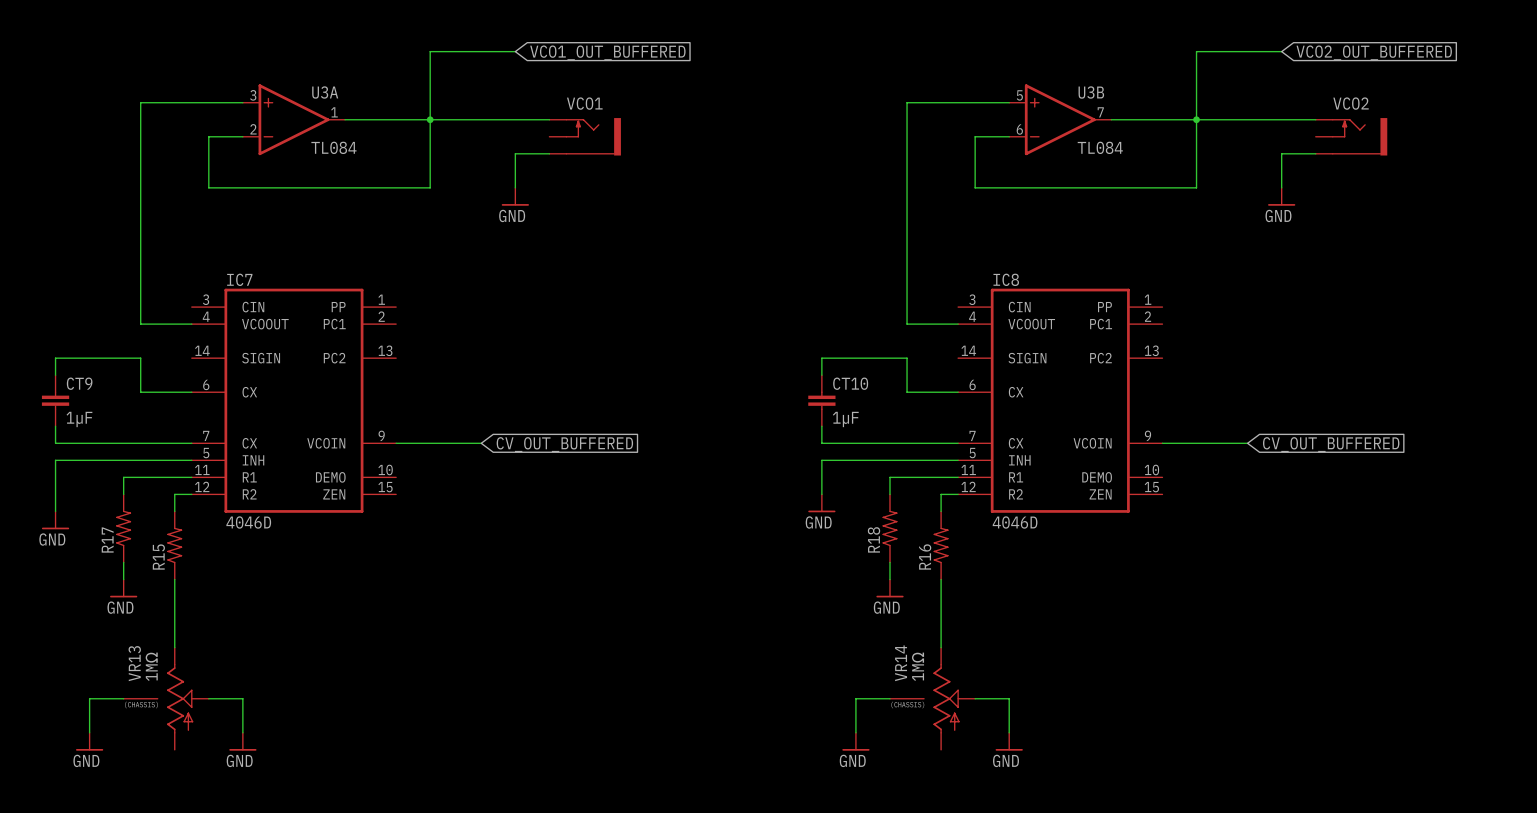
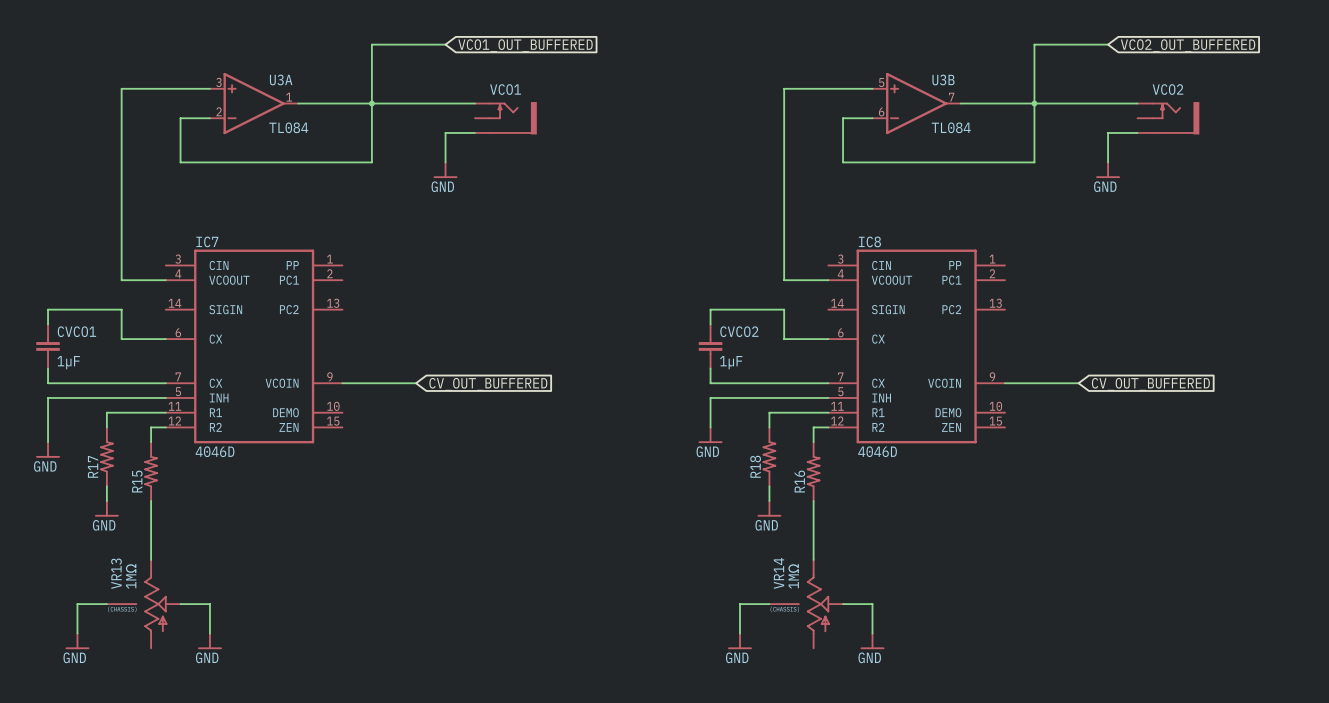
CT9 name: CT9 (79, 383) -> CVCO1 (76, 331)
CT10 name: CT10 (850, 383) -> CVCO2 (739, 331)

